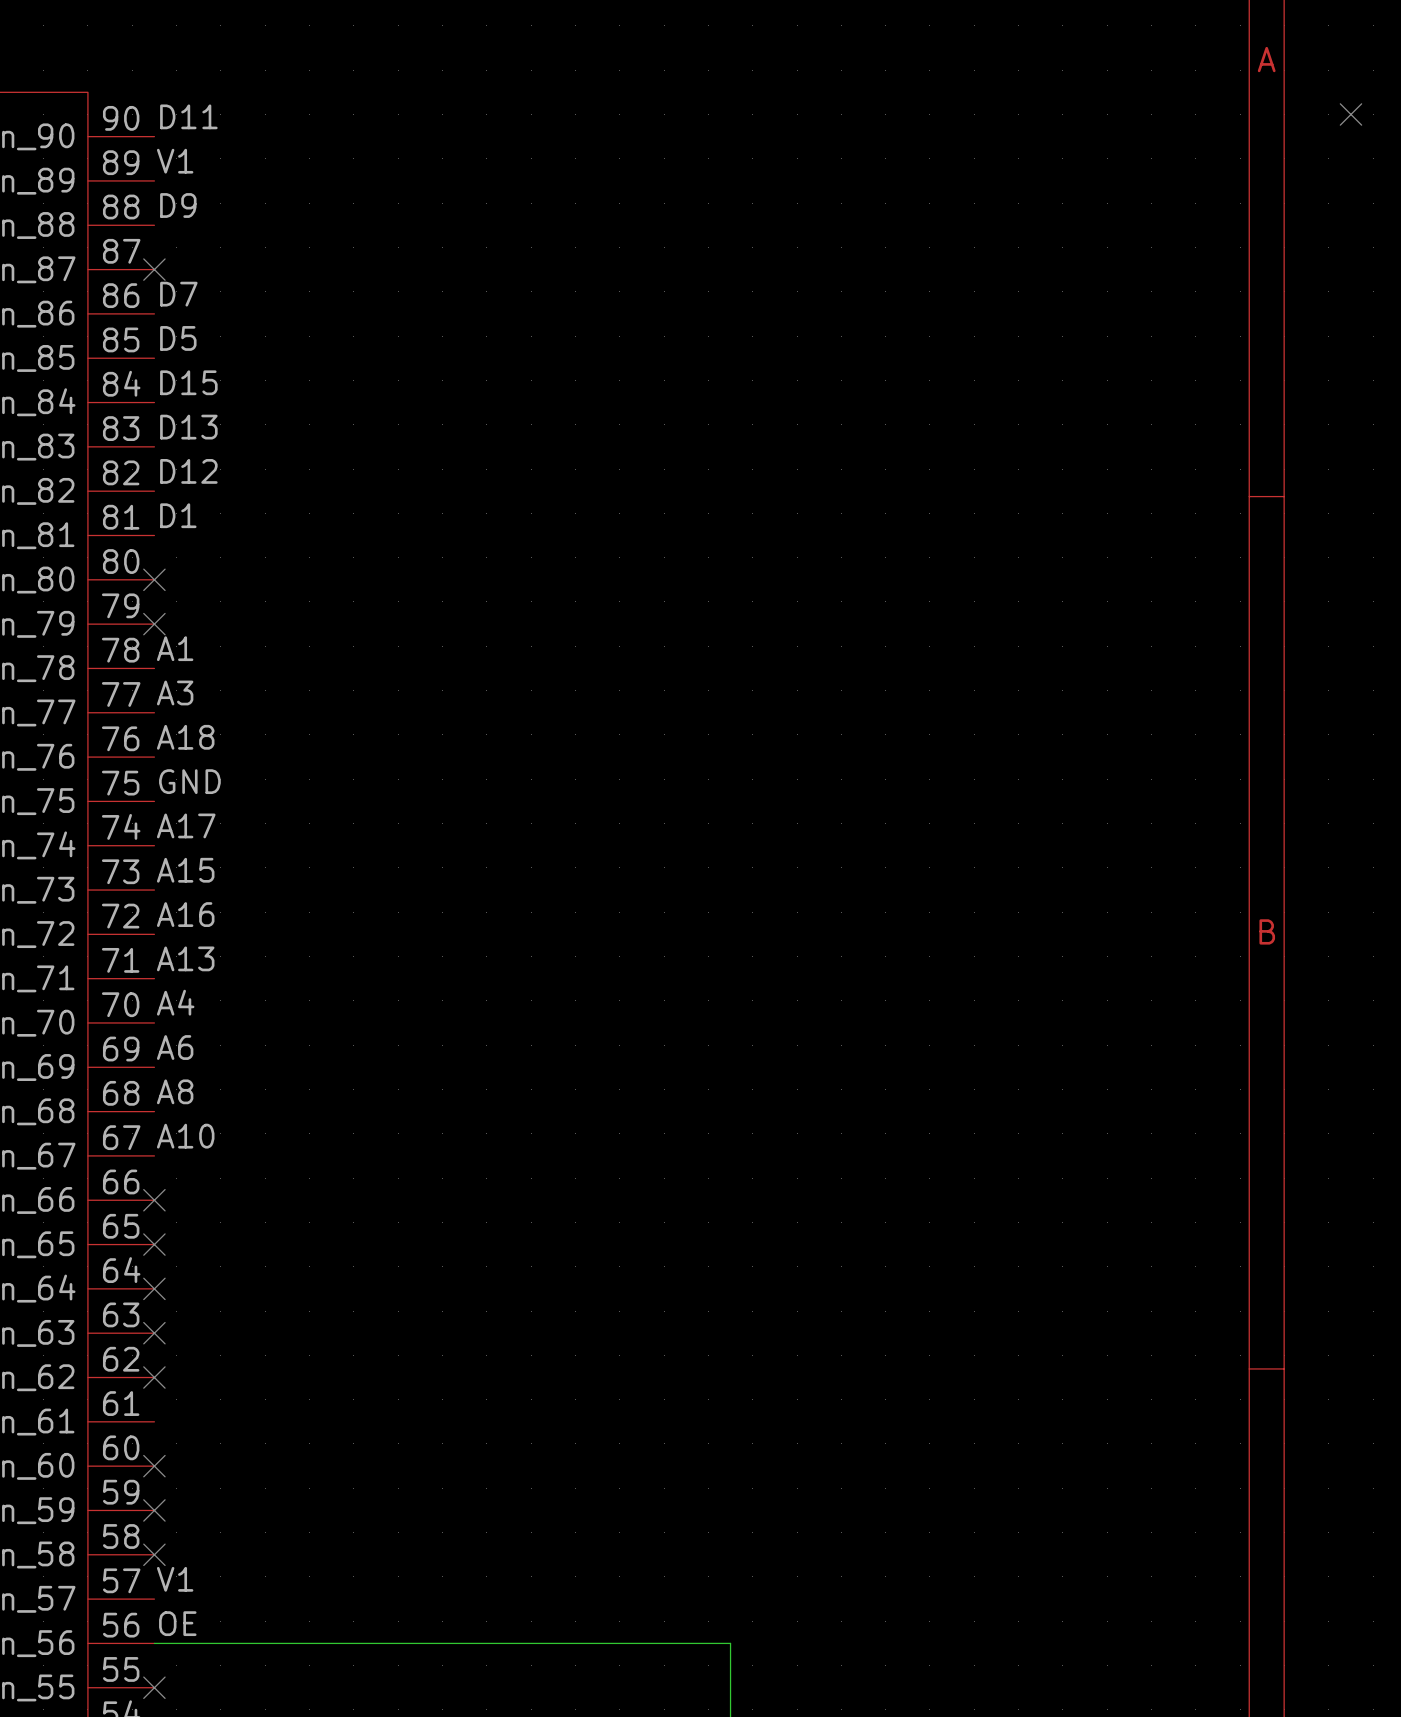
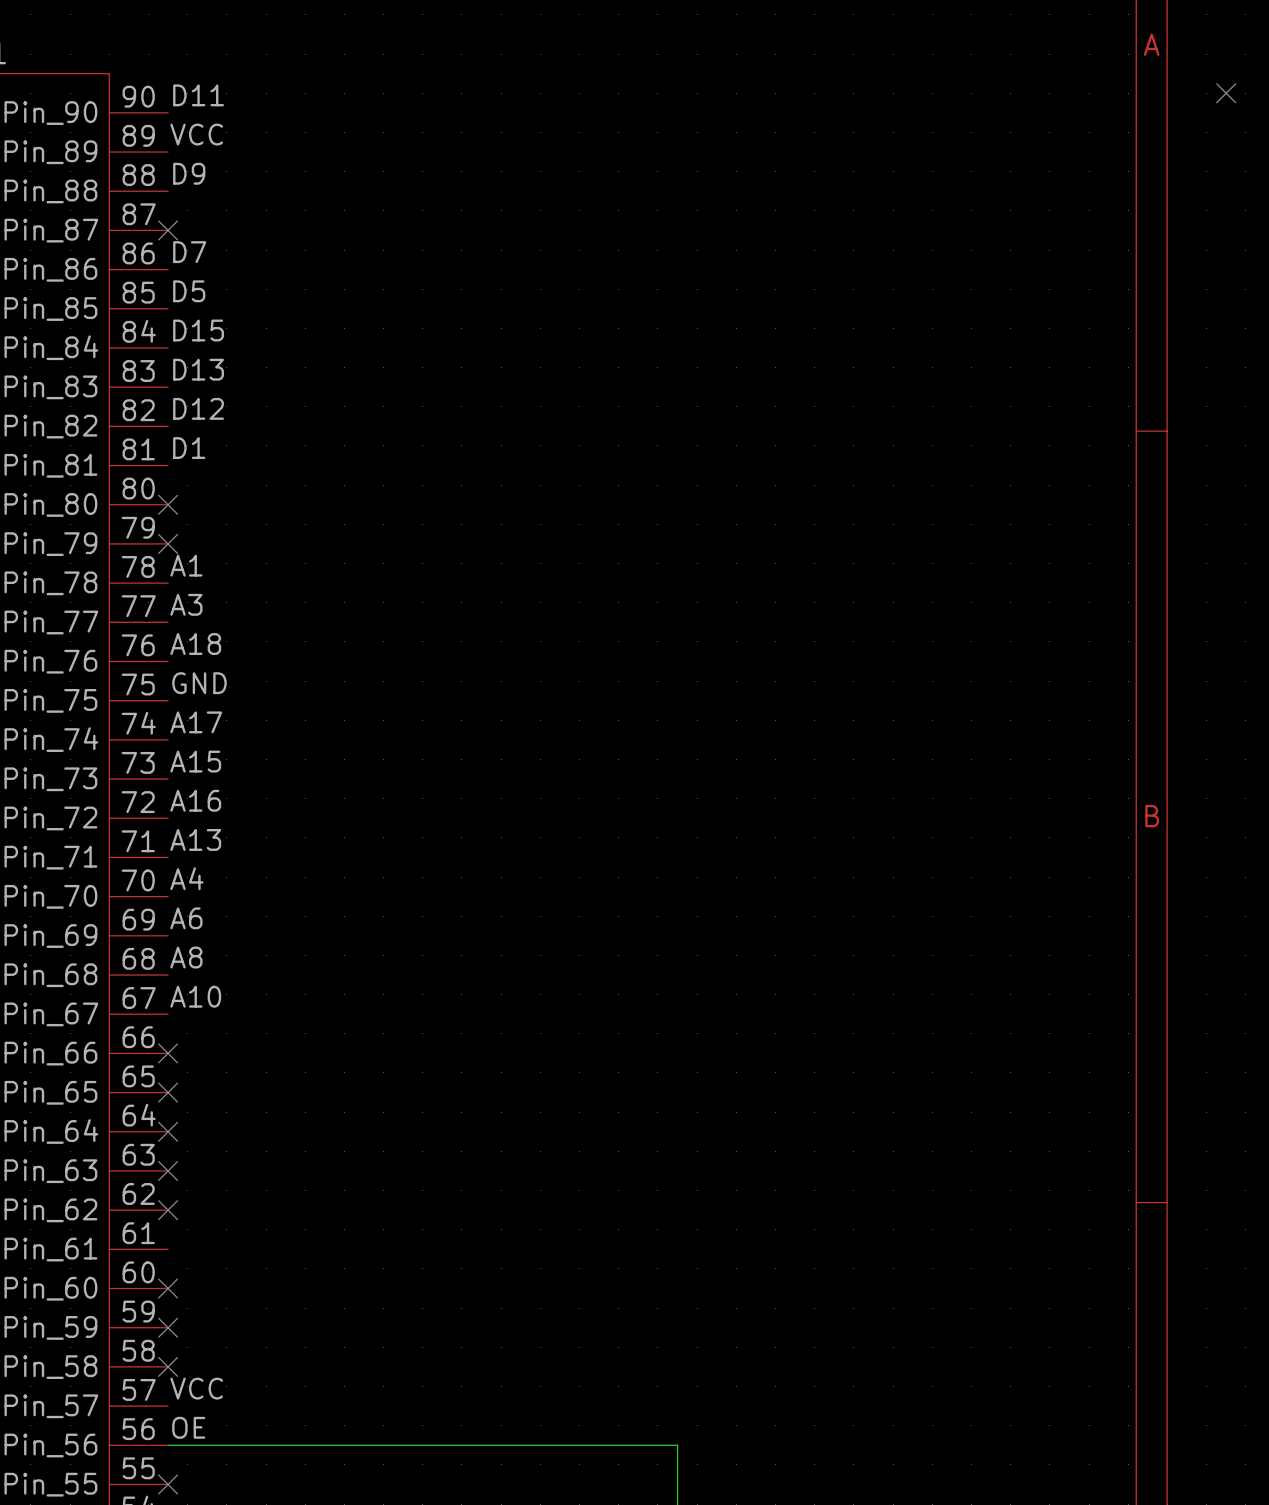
label: V1 (175, 161) -> VCC (196, 134)
label: V1 (175, 1579) -> VCC (196, 1388)

